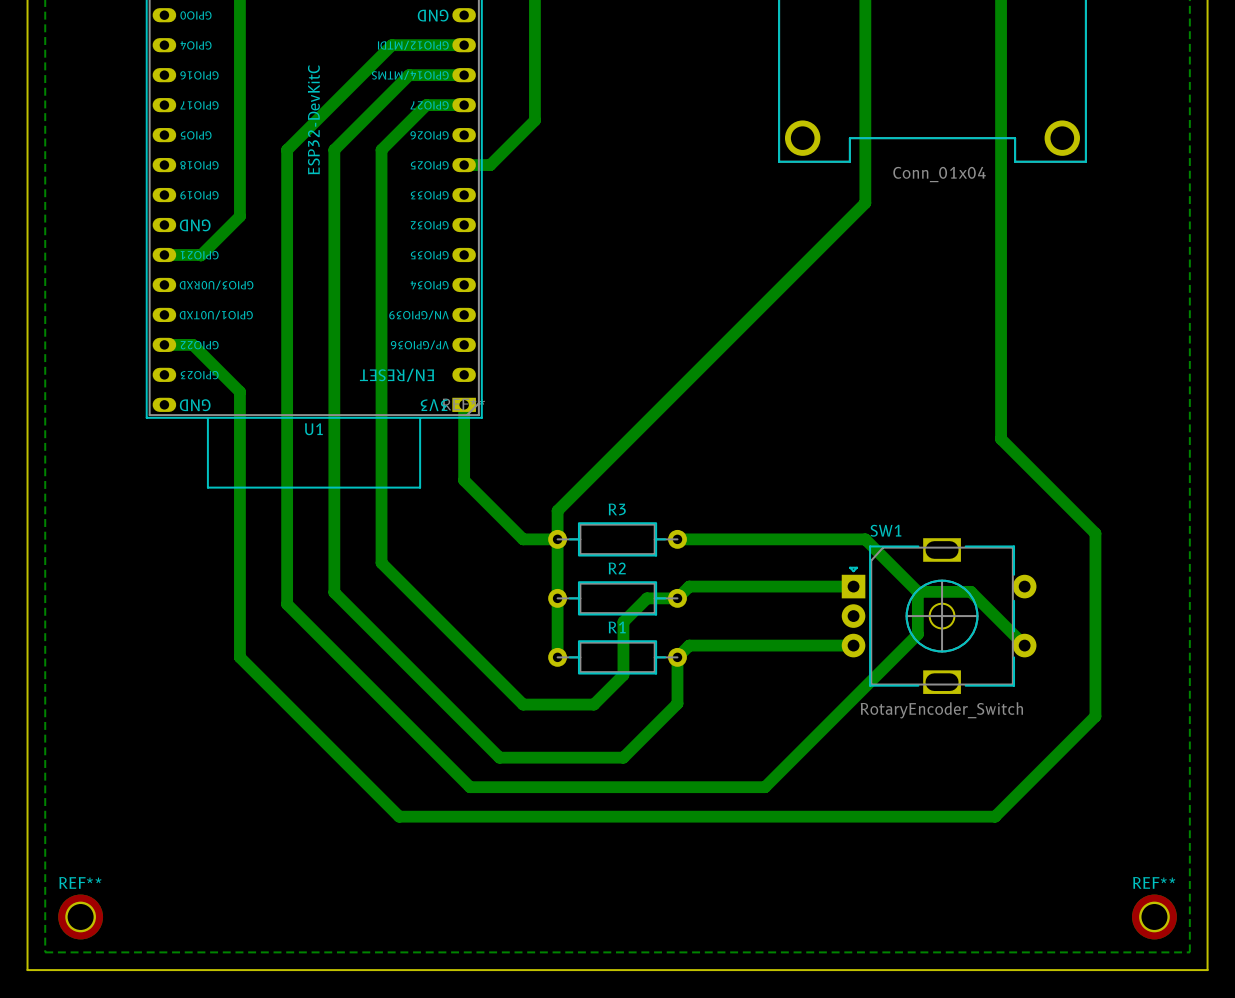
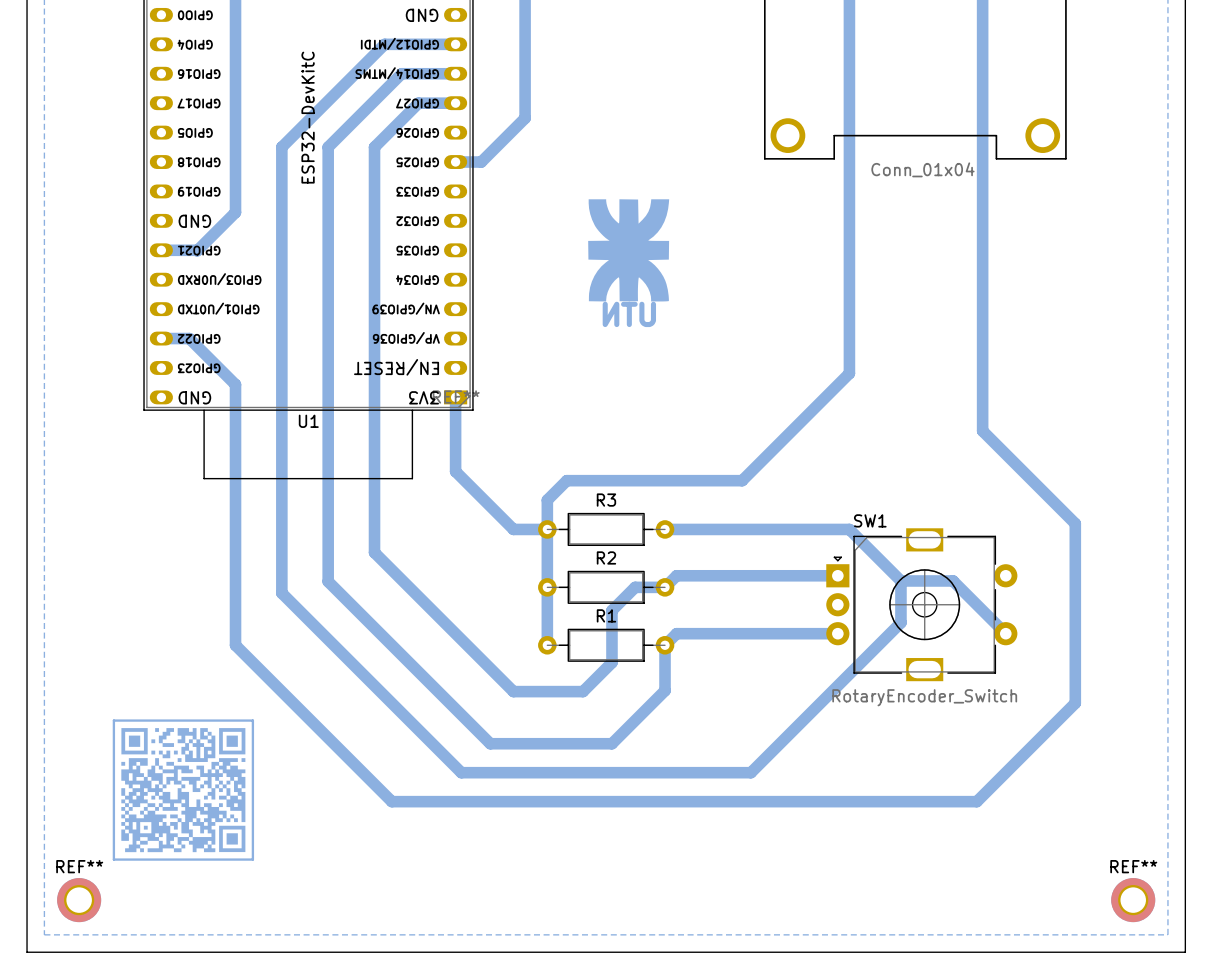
drawing: none -> [588, 199, 670, 302]
bottom track: (865, 203) (557, 510) -> (849, 199) (849, 373) (742, 480) (566, 480) (547, 501)
bottom track: none -> (113, 720) (252, 720) (252, 859) (113, 859) (113, 720)
drawing: none -> [121, 728, 246, 853]

